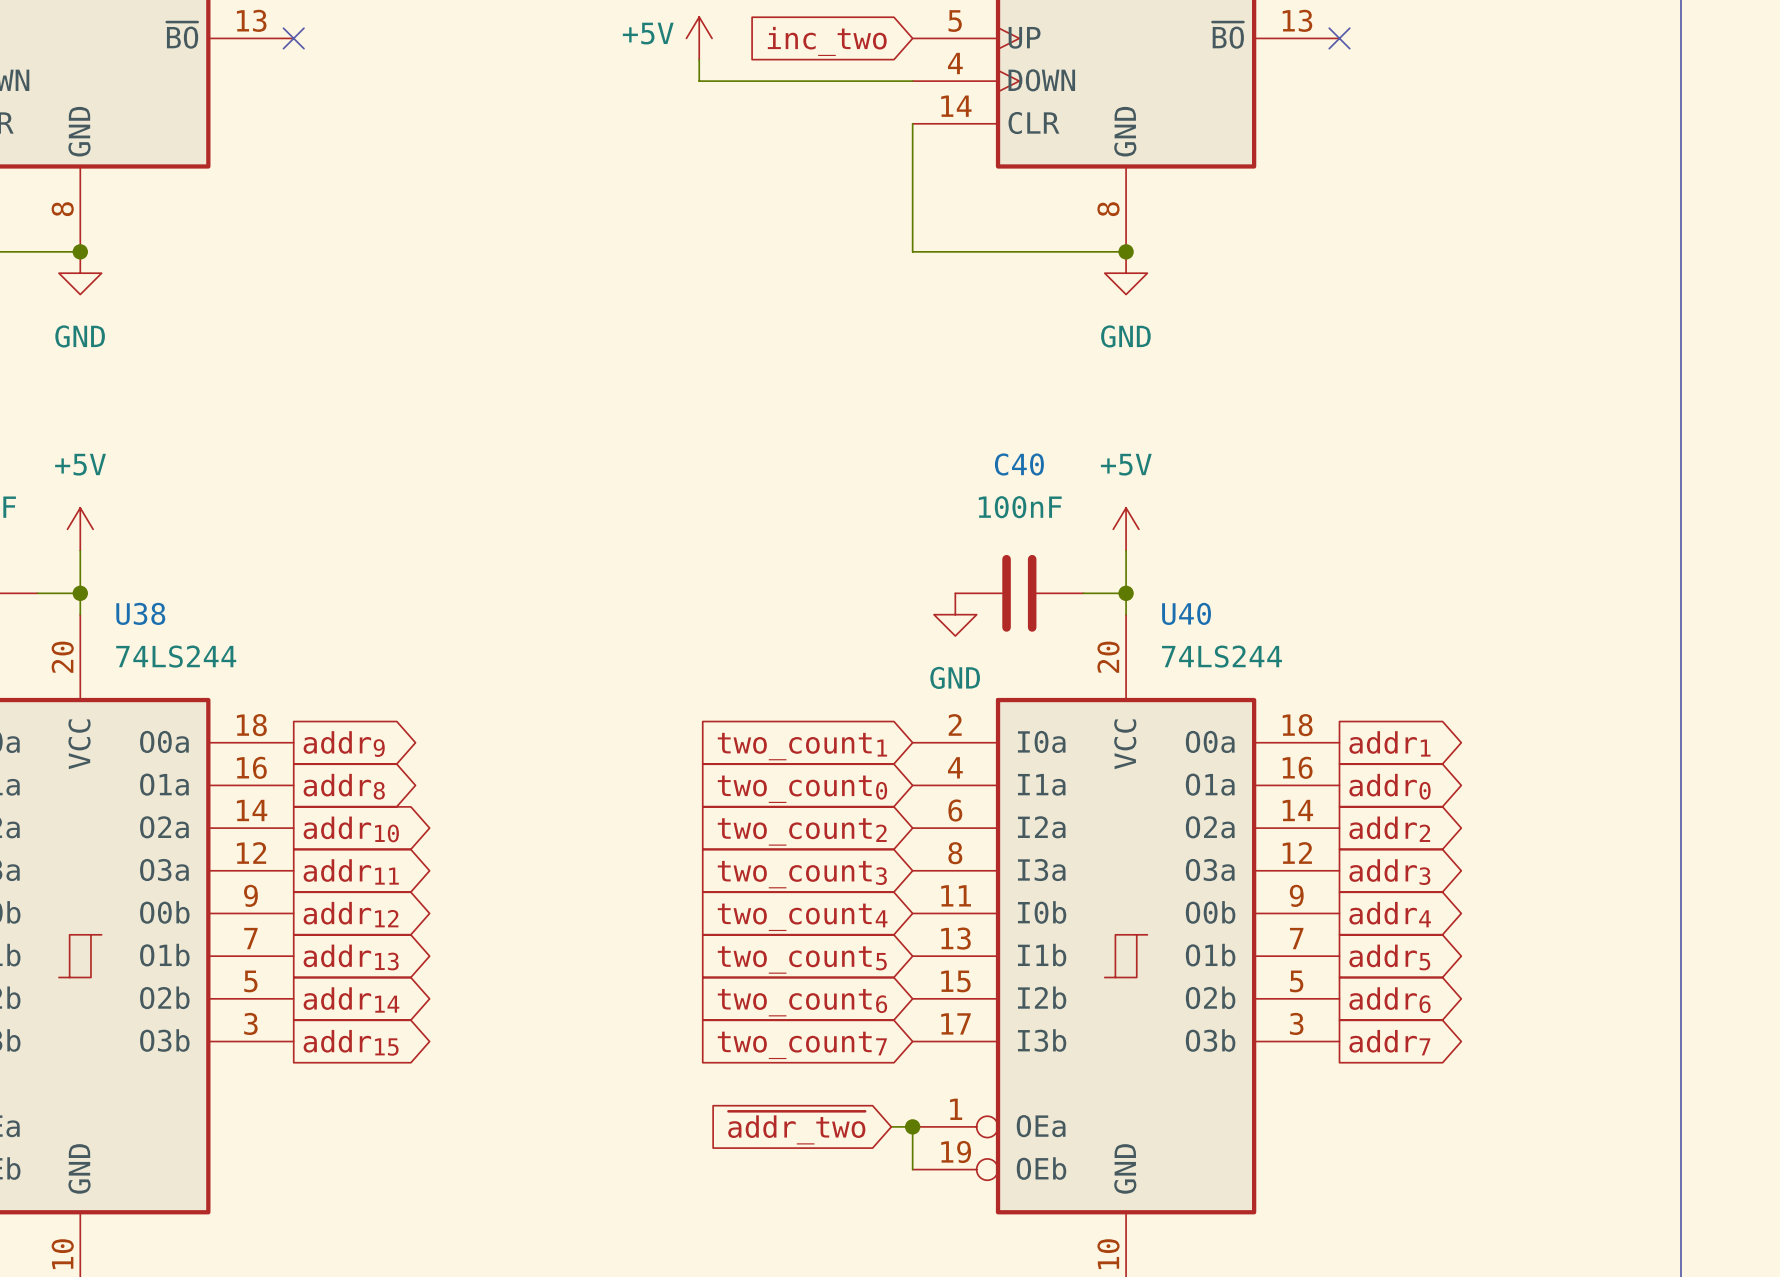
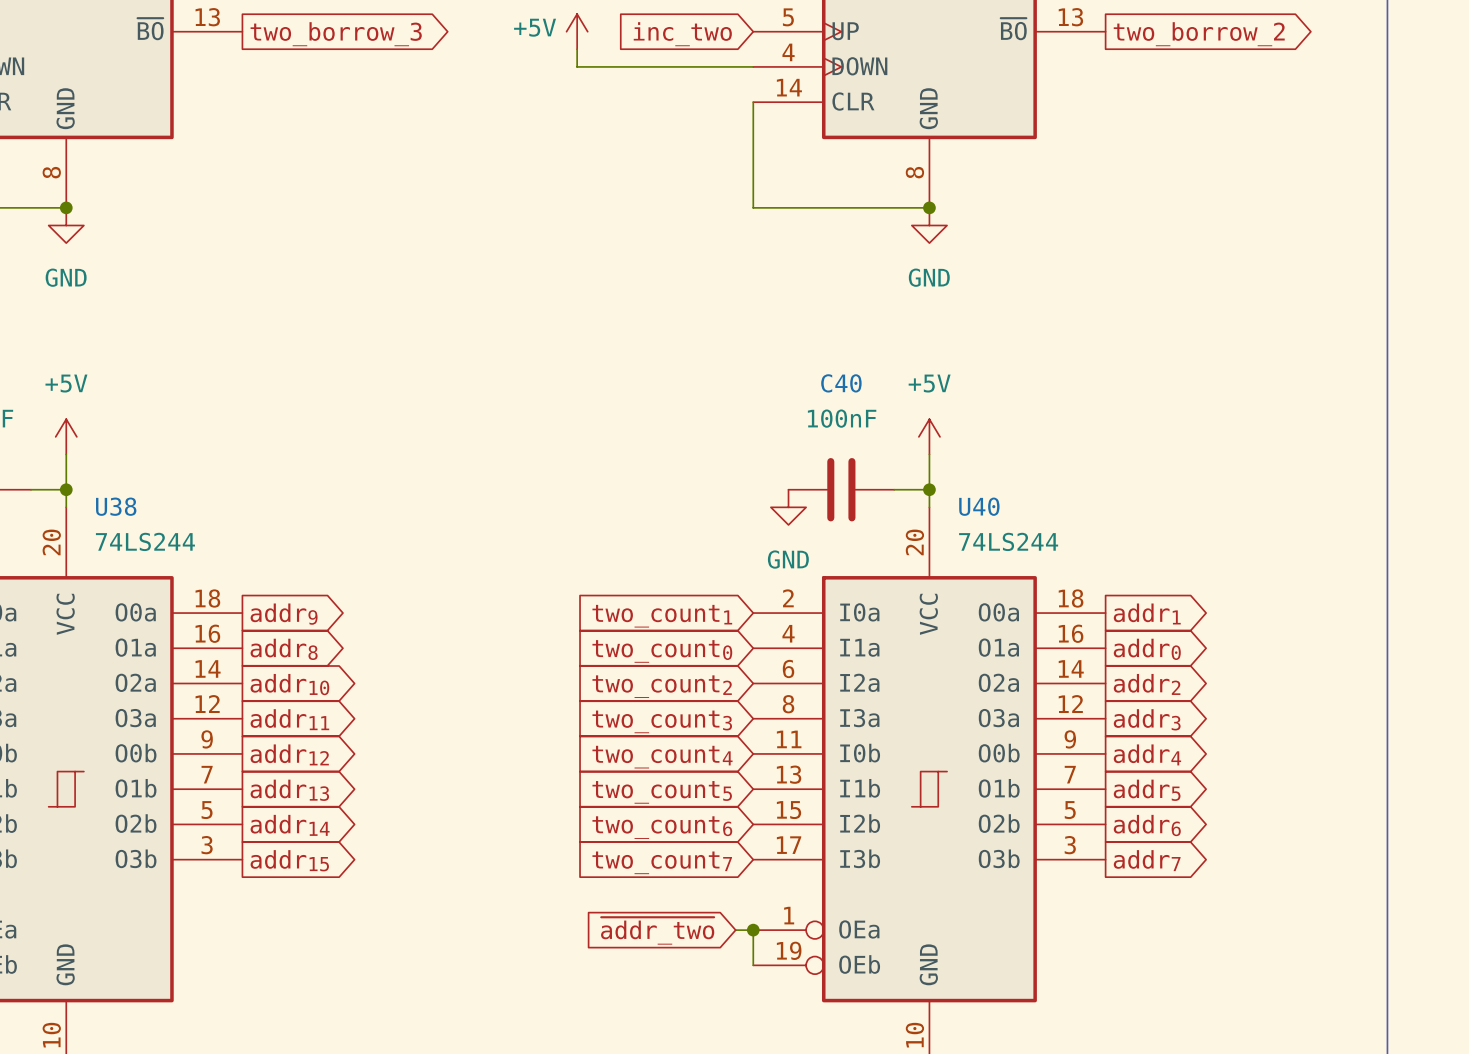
no-connect mark: (293, 38) -> none
no-connect mark: (1339, 38) -> none
global label: none -> two_borrow_3 (336, 34)
global label: none -> two_borrow_2 (1199, 34)

